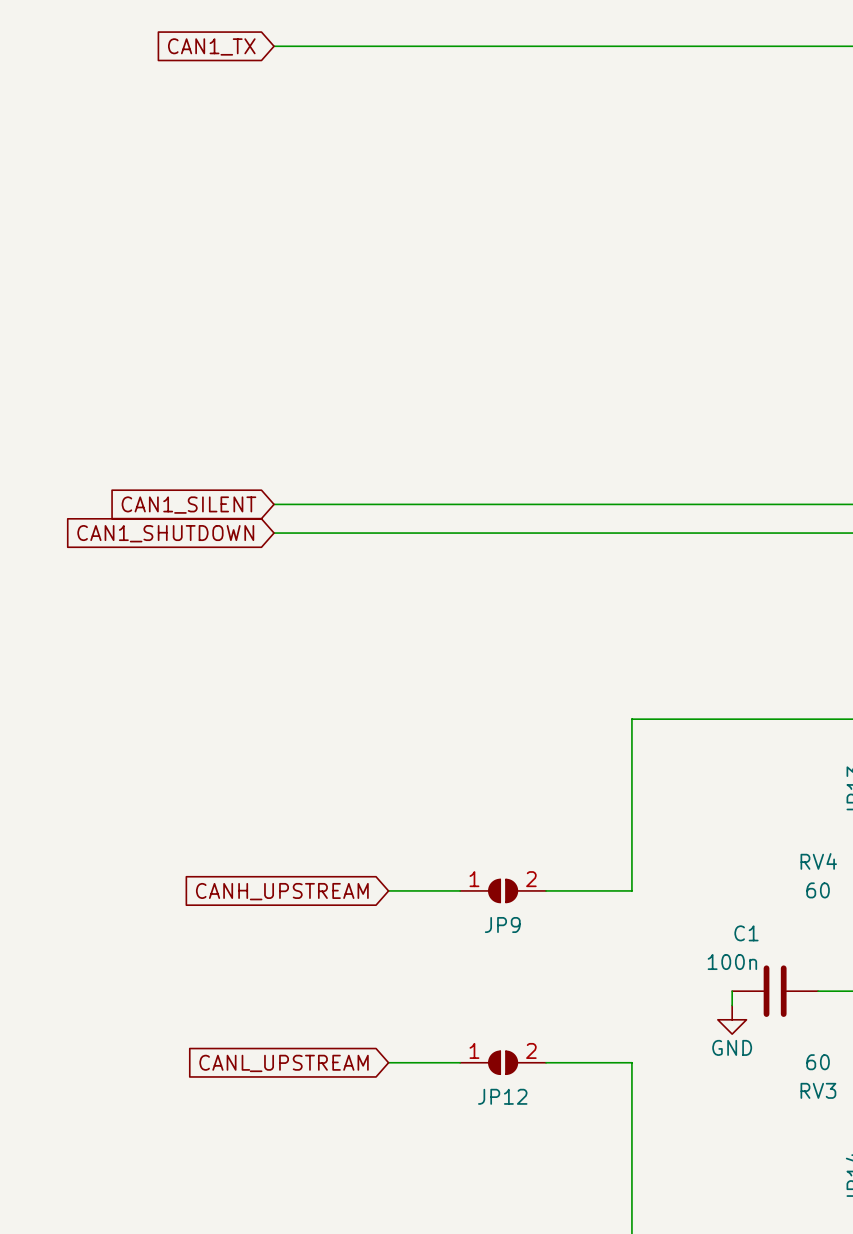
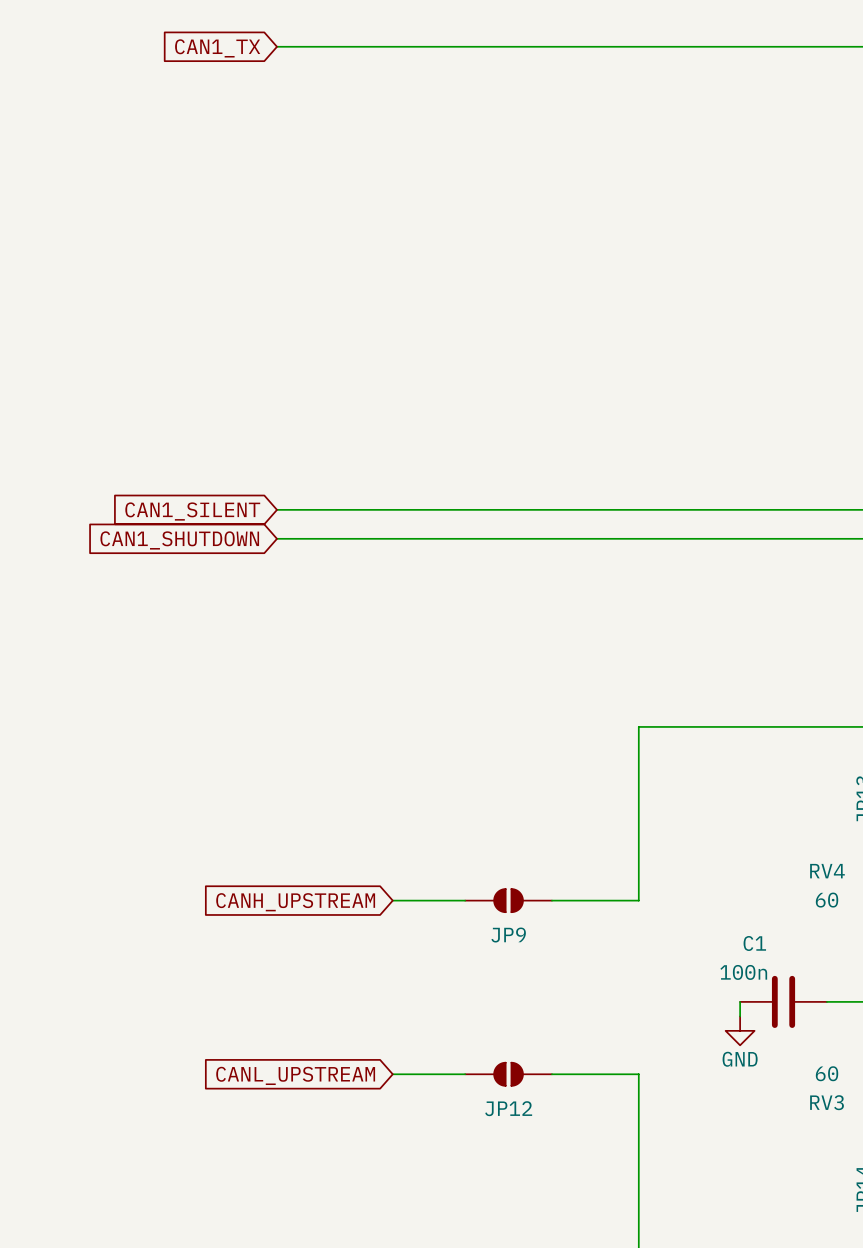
JP9 pin number: 1 (474, 879) -> none
JP9 pin number: 2 (531, 879) -> none
JP12 pin number: 1 (474, 1050) -> none
JP12 pin number: 2 (531, 1050) -> none

